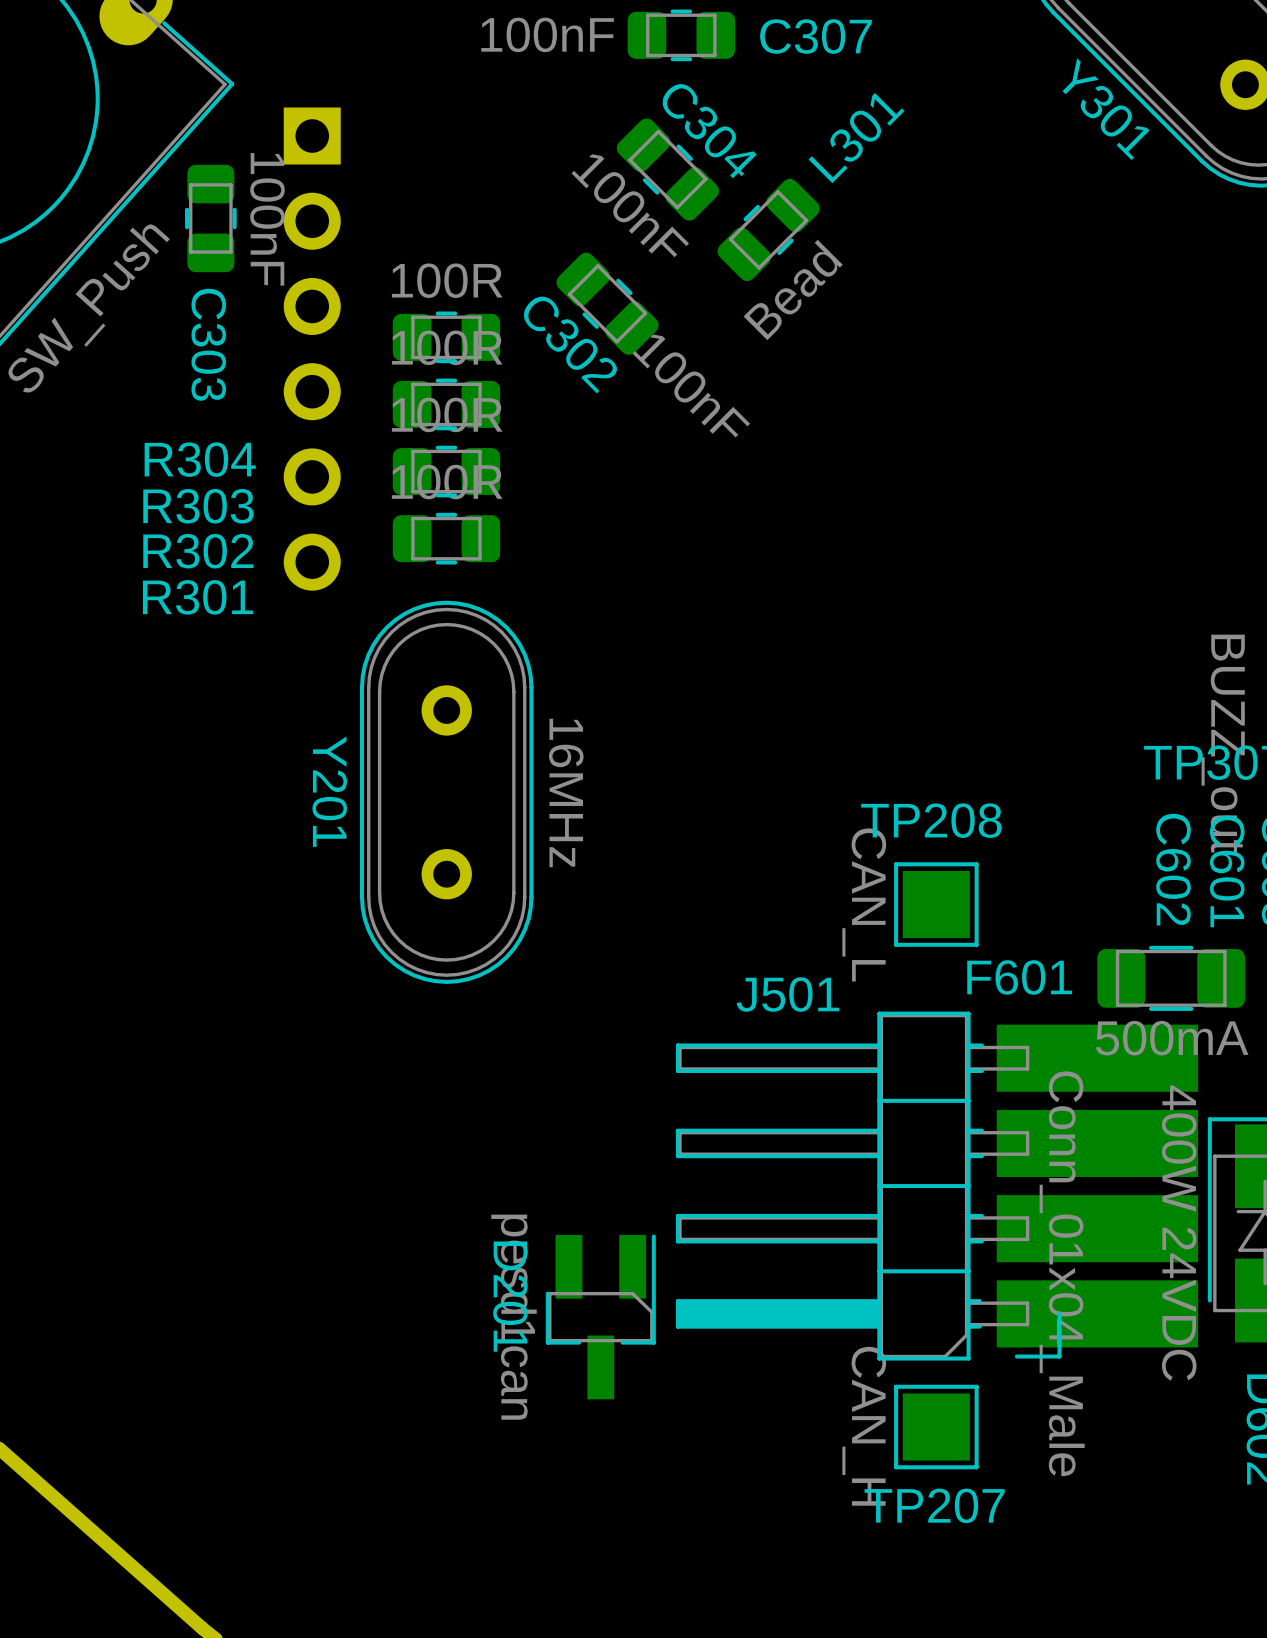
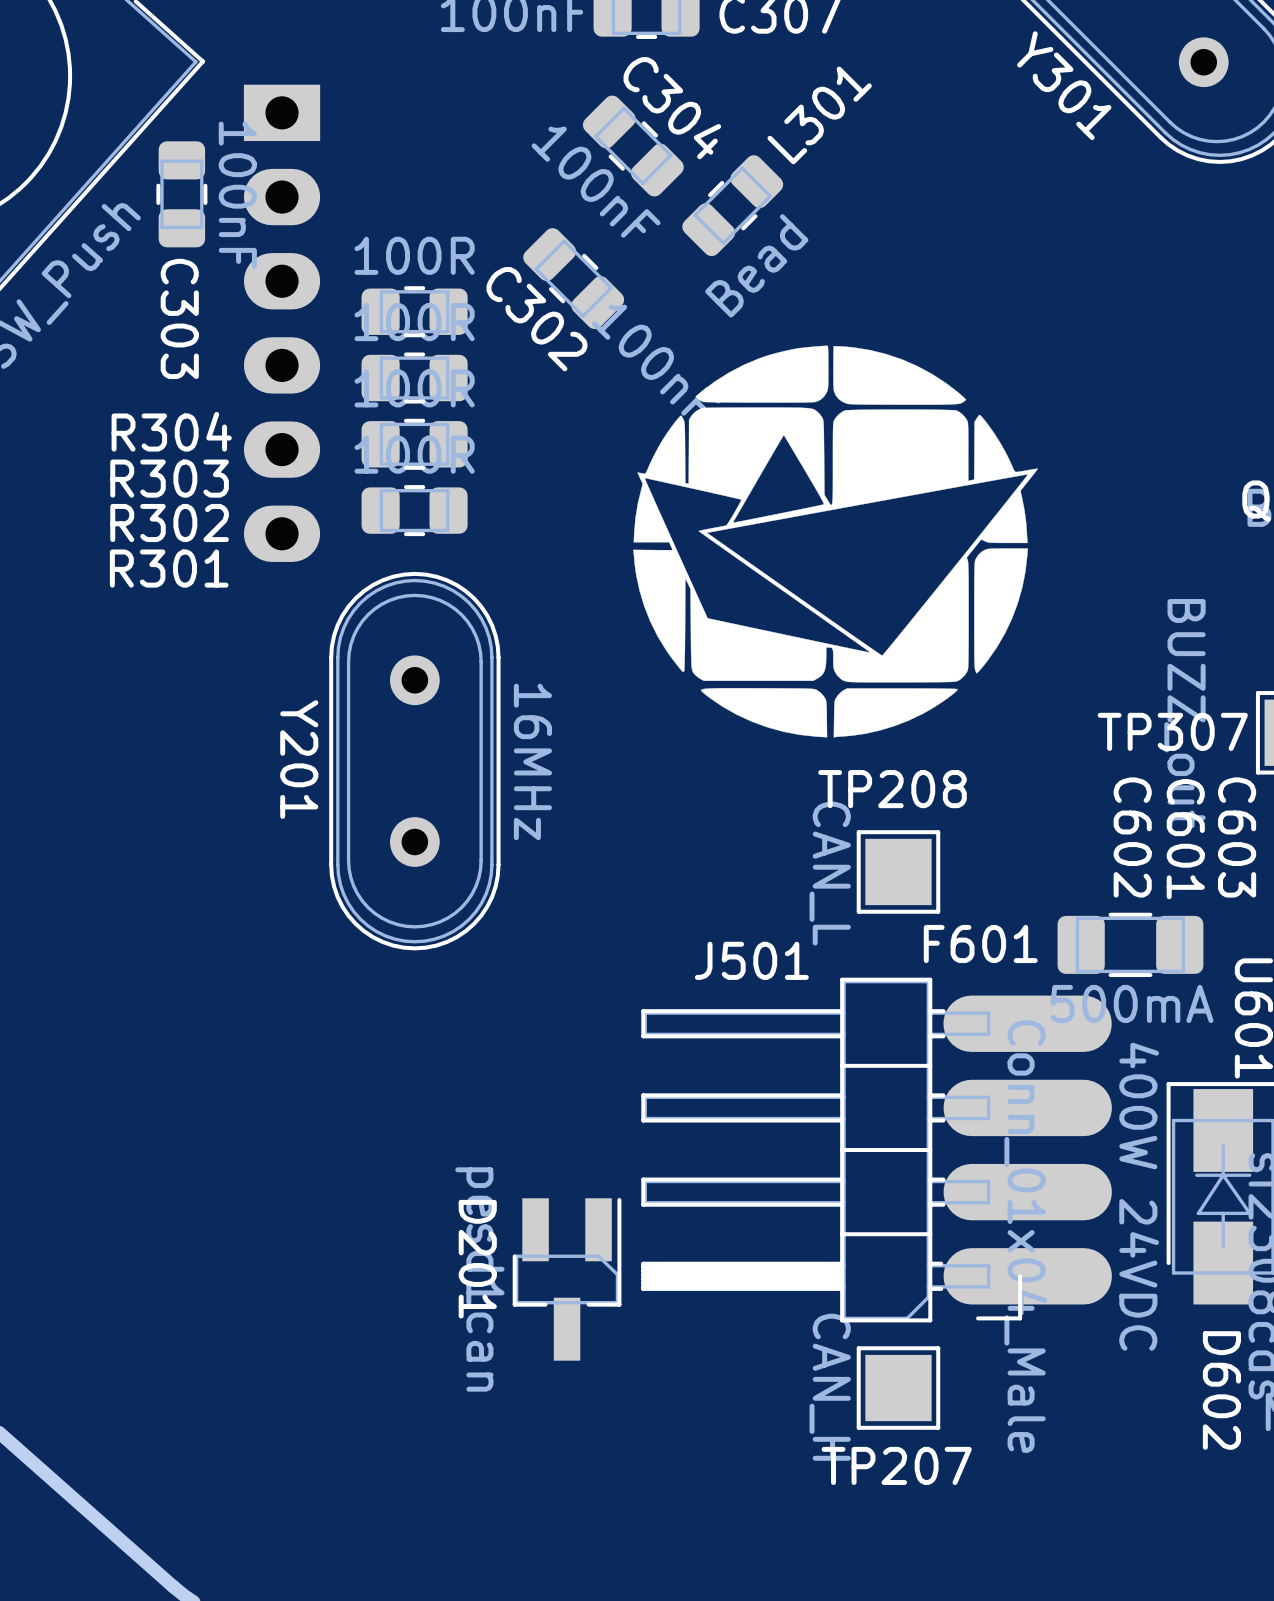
part footprint: [283, 107, 341, 591] -> [243, 84, 321, 562]
drawing: none -> [633, 345, 1038, 738]
J501 footprint: [675, 1011, 1199, 1361] -> [641, 977, 1112, 1323]

